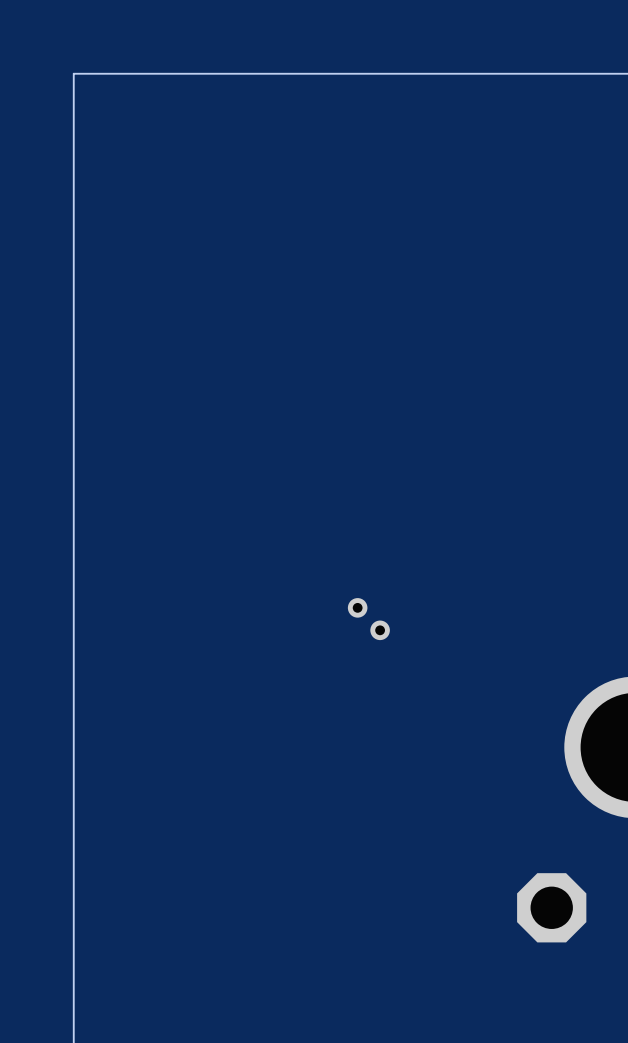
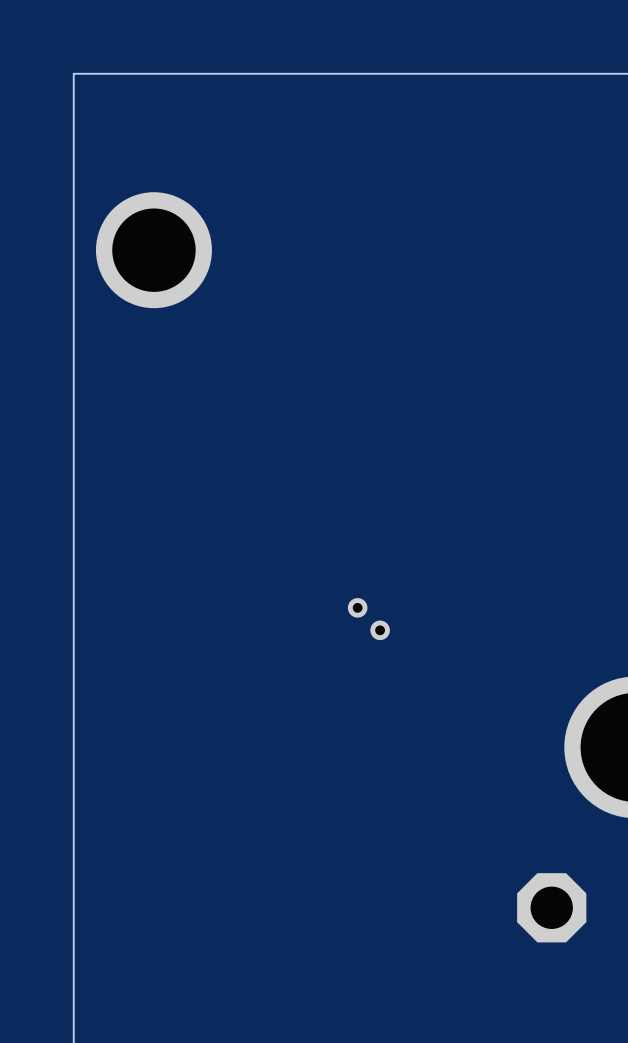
part: none -> (153, 250)

